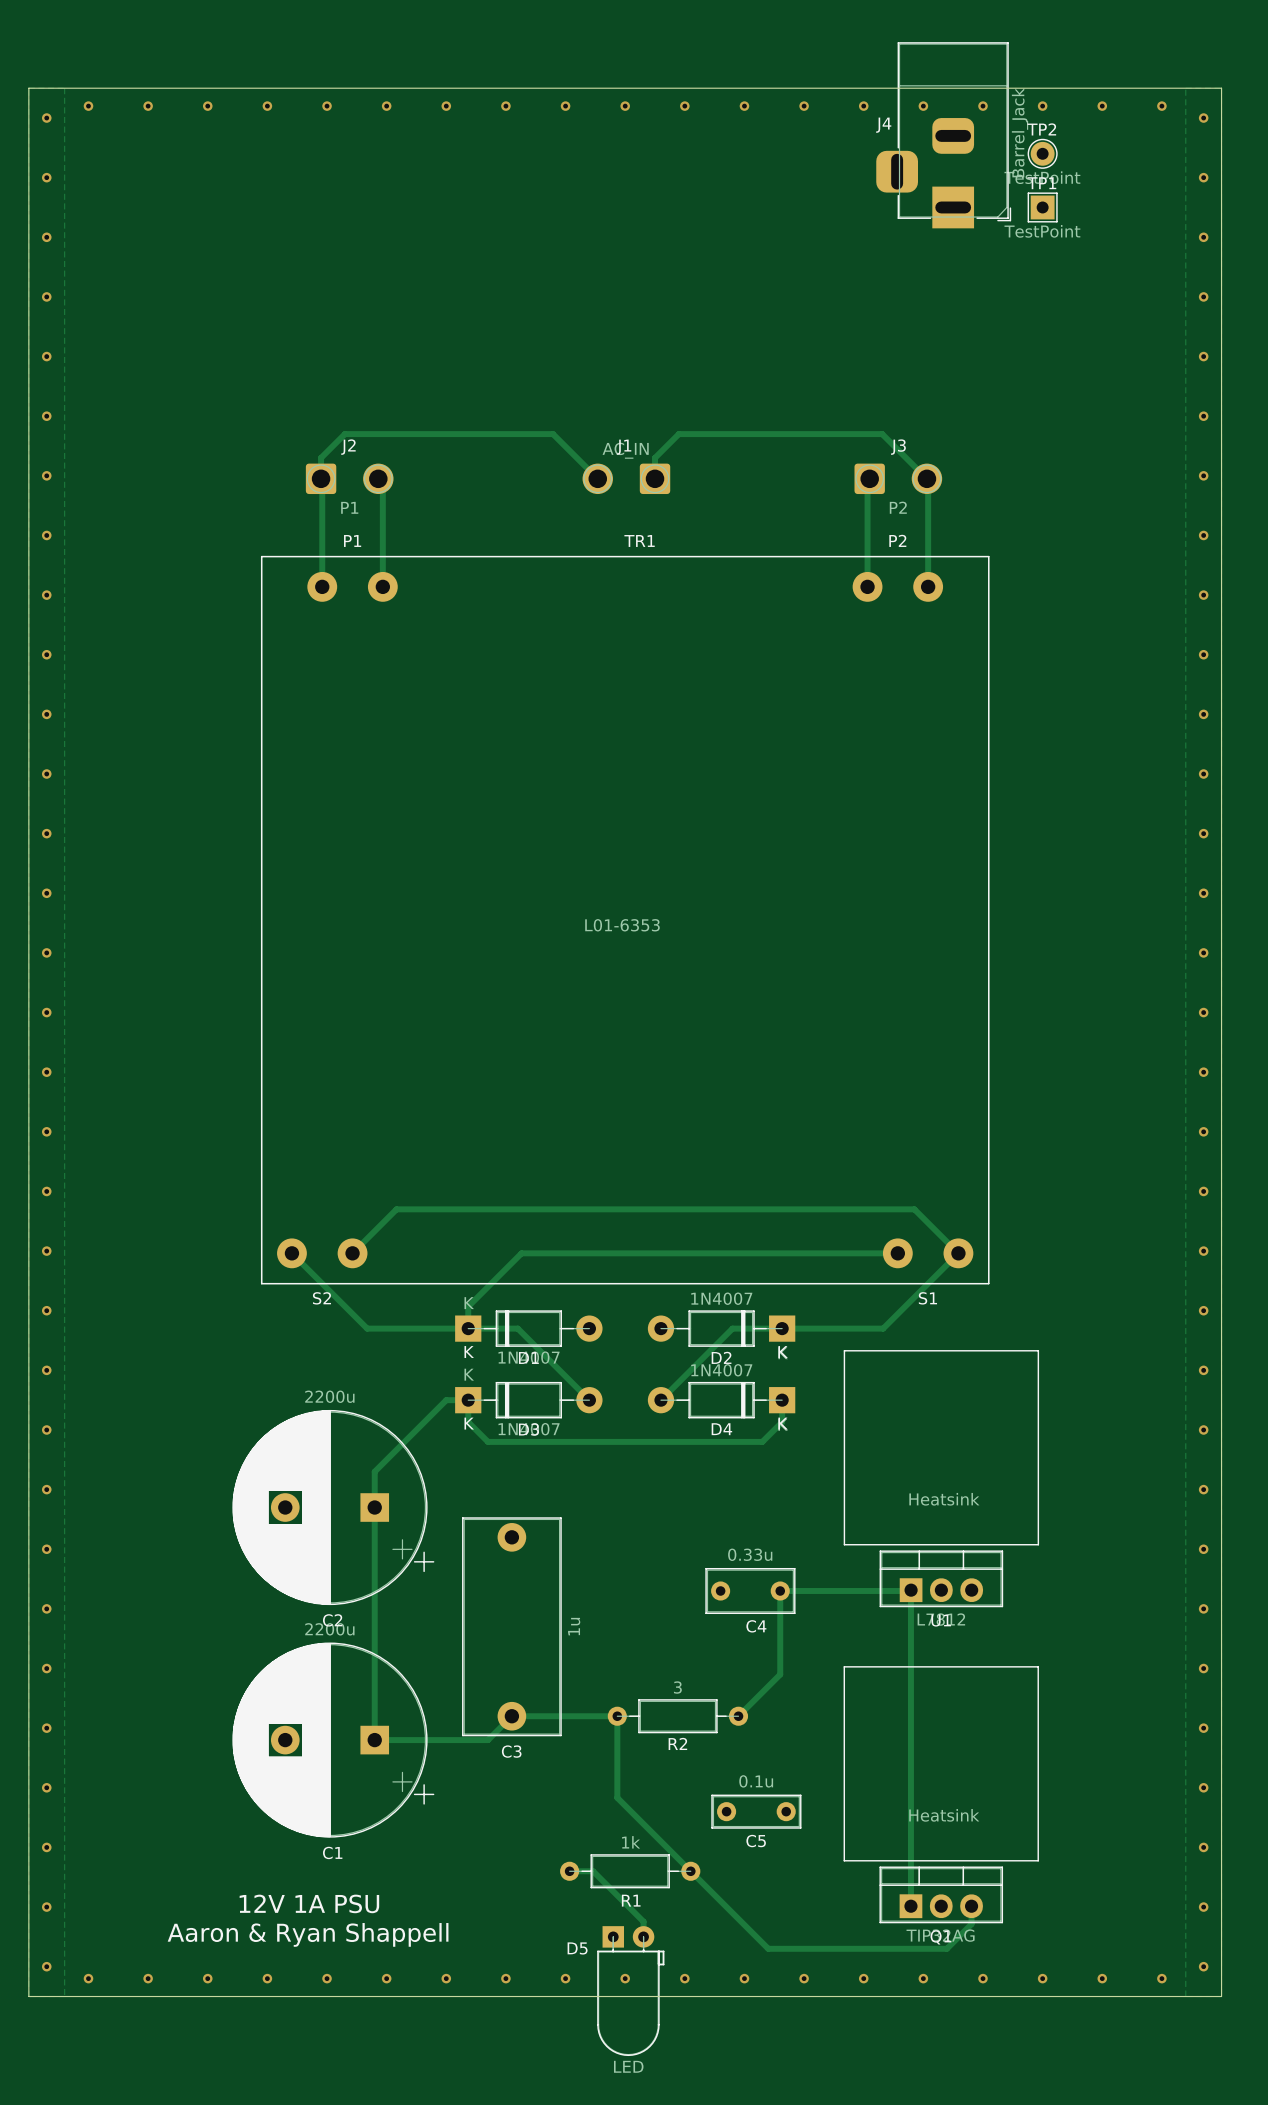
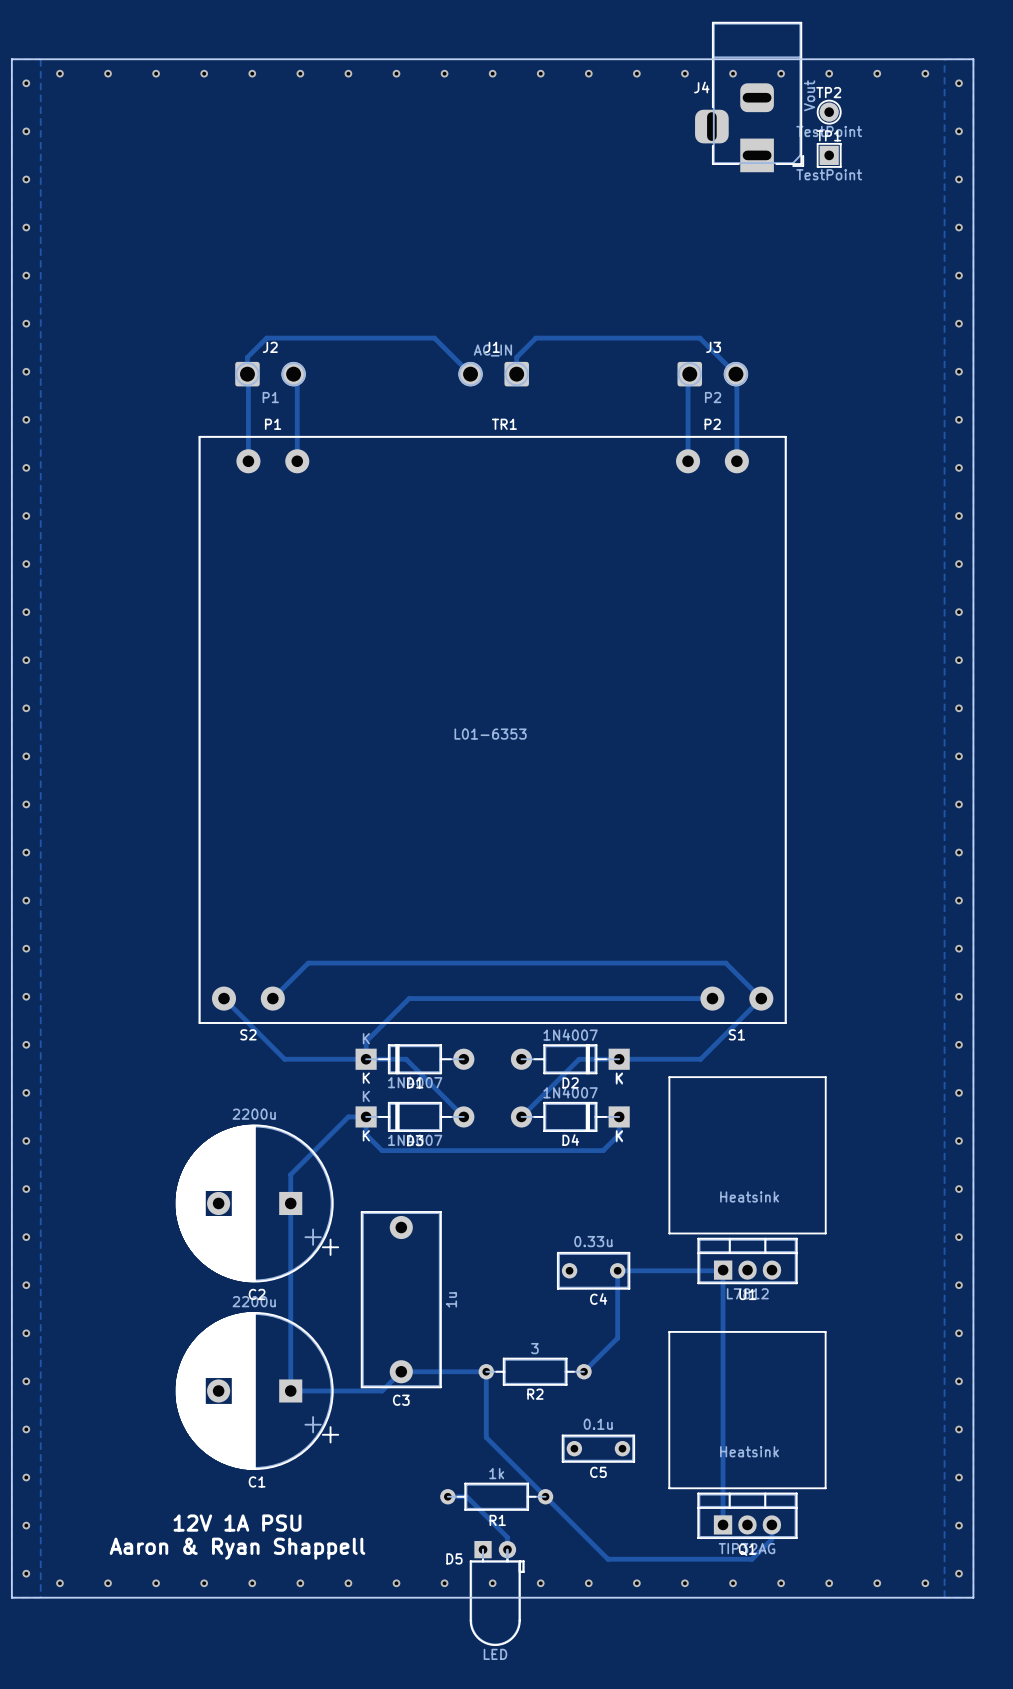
J4 value: Barrel_Jack (1020, 132) -> Vout (809, 95)

